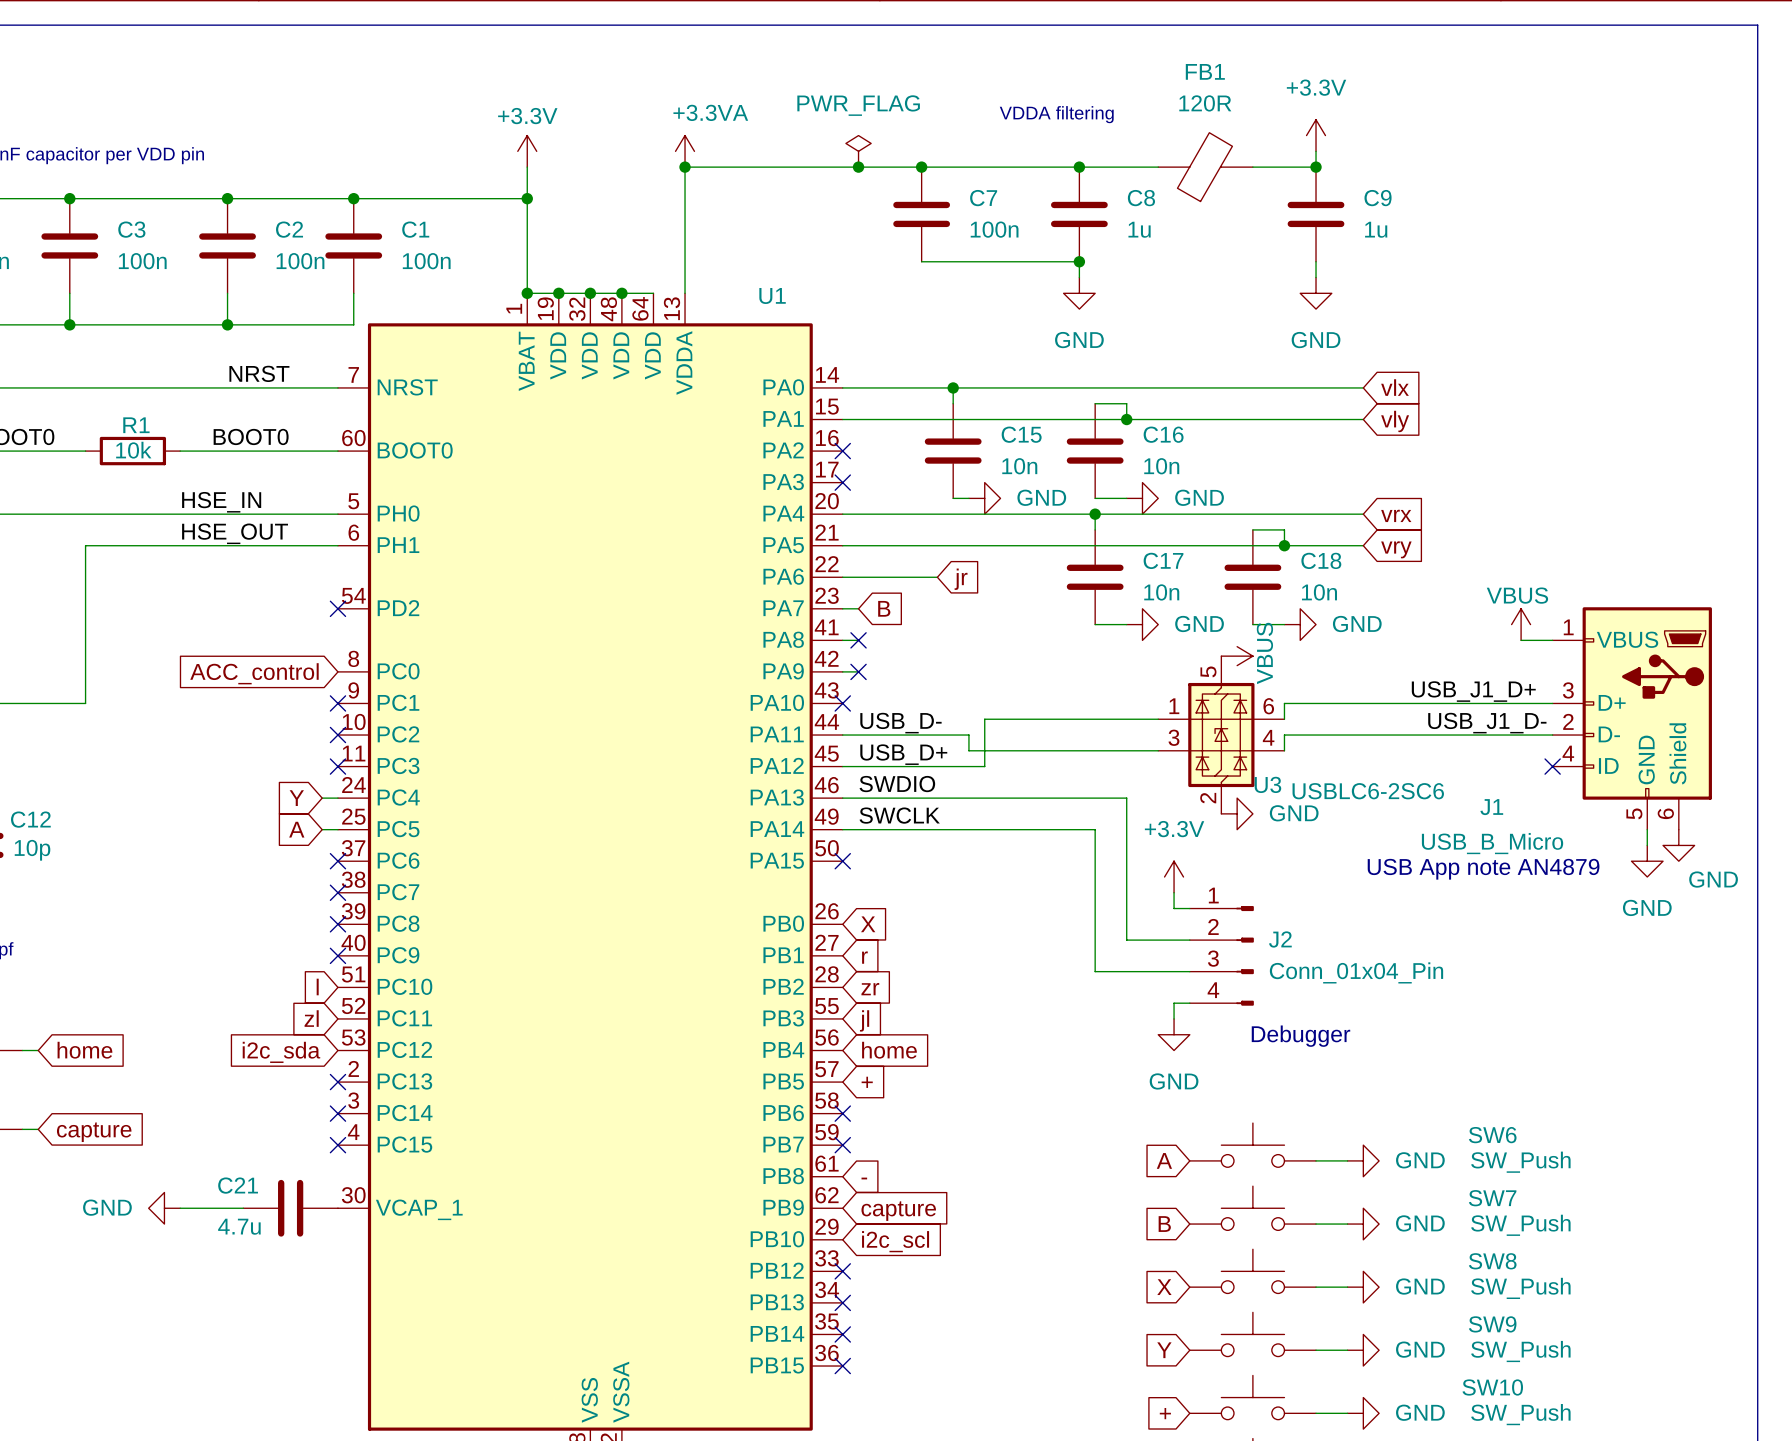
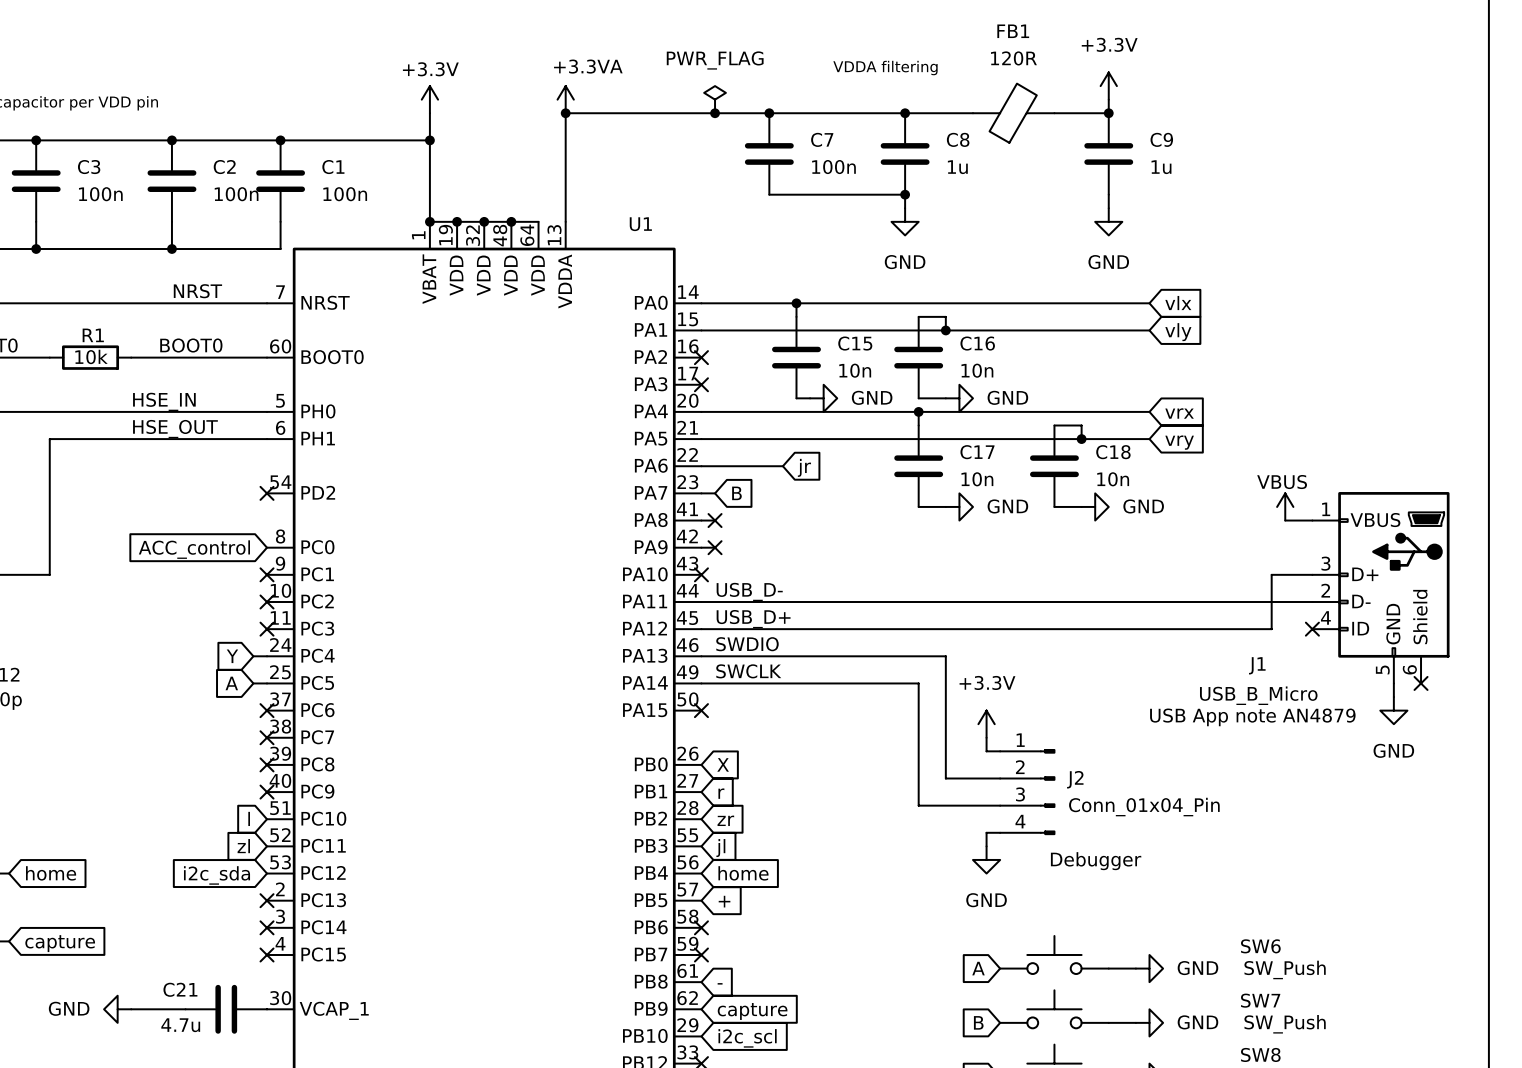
power symbol: VBUS (1237, 656) -> none
label: USB_J1_D+ (1473, 691) -> none
wire: (1505, 703) (1284, 703) (1284, 719) -> (1271, 574) (1271, 629) (823, 629)
wire: (1158, 719) (984, 719) (984, 766) -> none
label: USB_J1_D- (1487, 723) -> none
wire: (968, 735) (968, 750) (1158, 750) -> (810, 601) (1081, 601)
U3: USBLC6-2SC6 (1221, 735) -> none
wire: (1284, 735) (1284, 750) -> none
power symbol: GND (1237, 813) -> none
no-connect mark: none -> (1421, 683)
power symbol: GND (1678, 845) -> none

